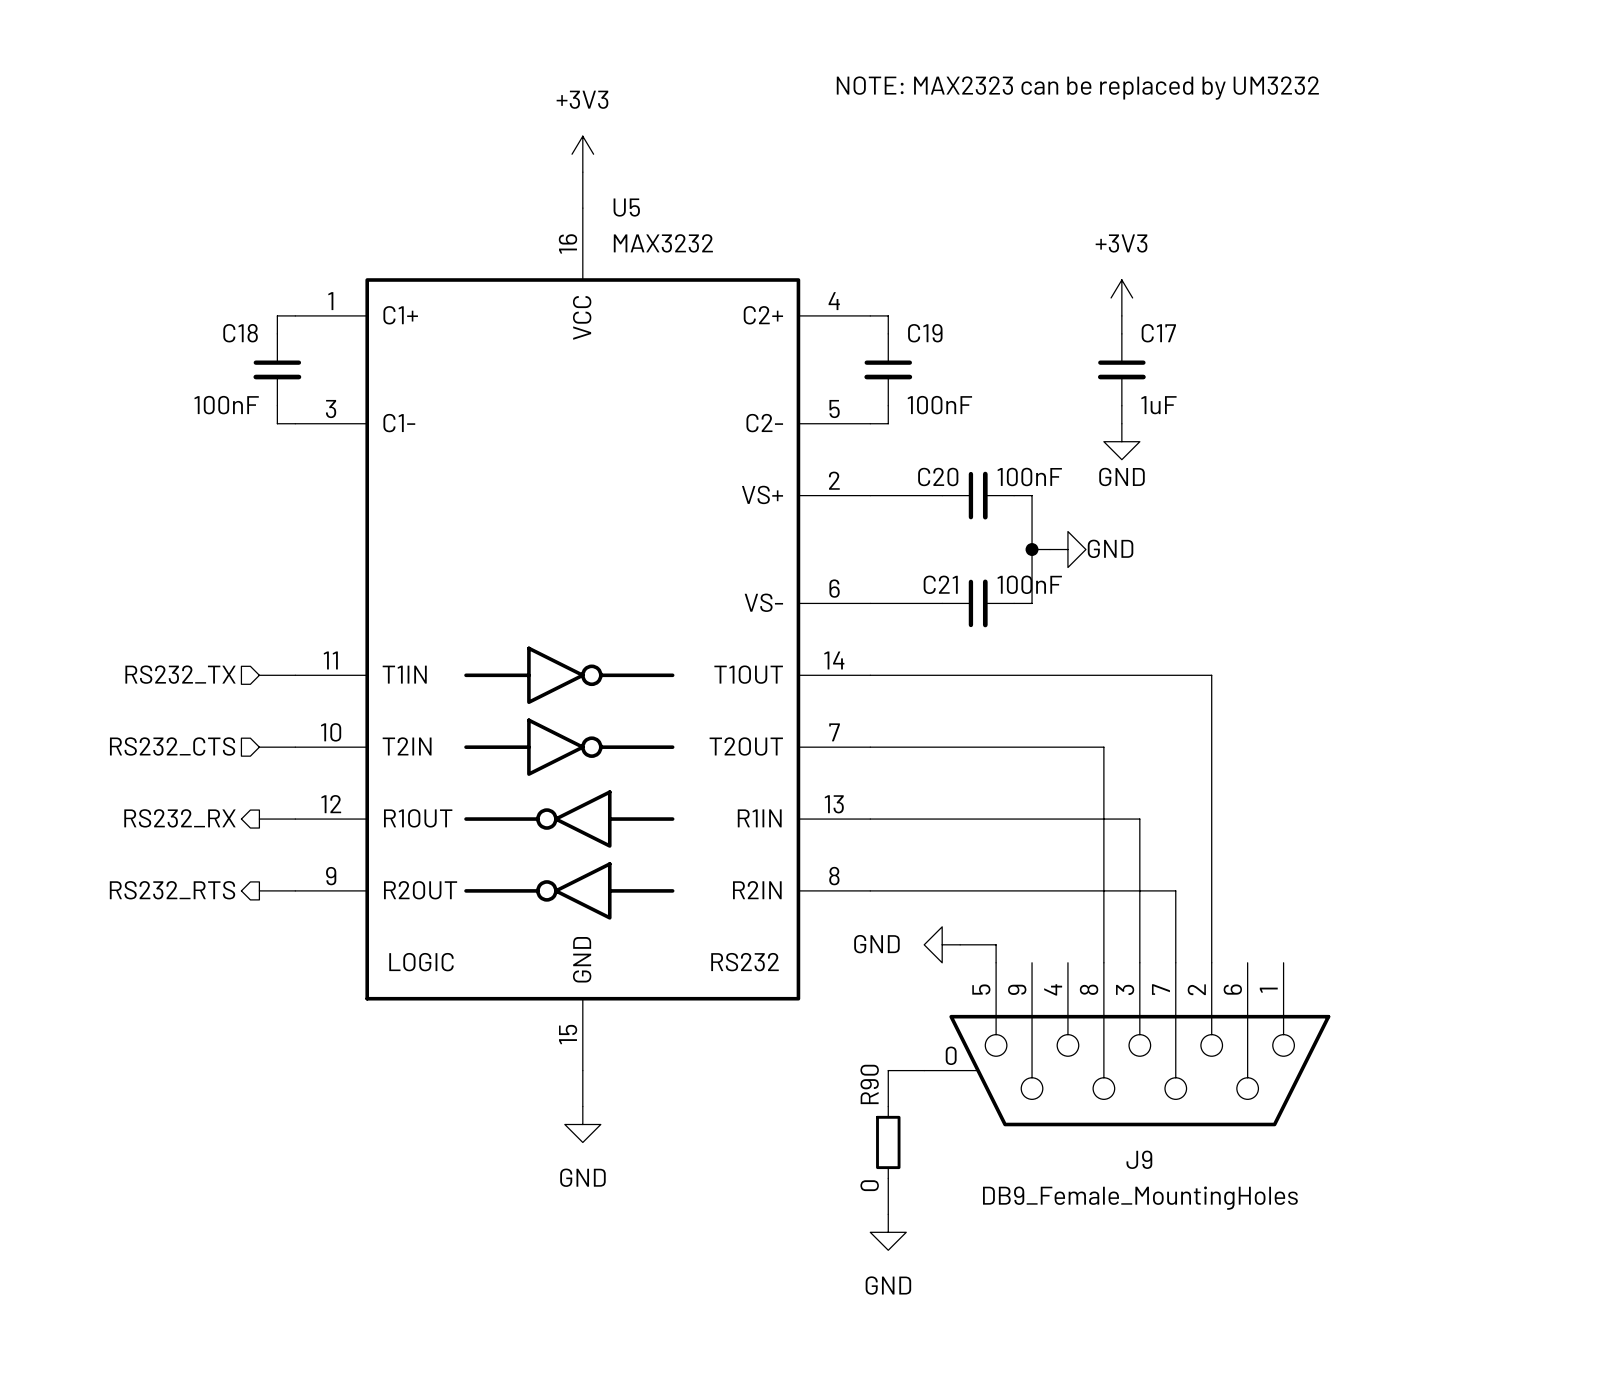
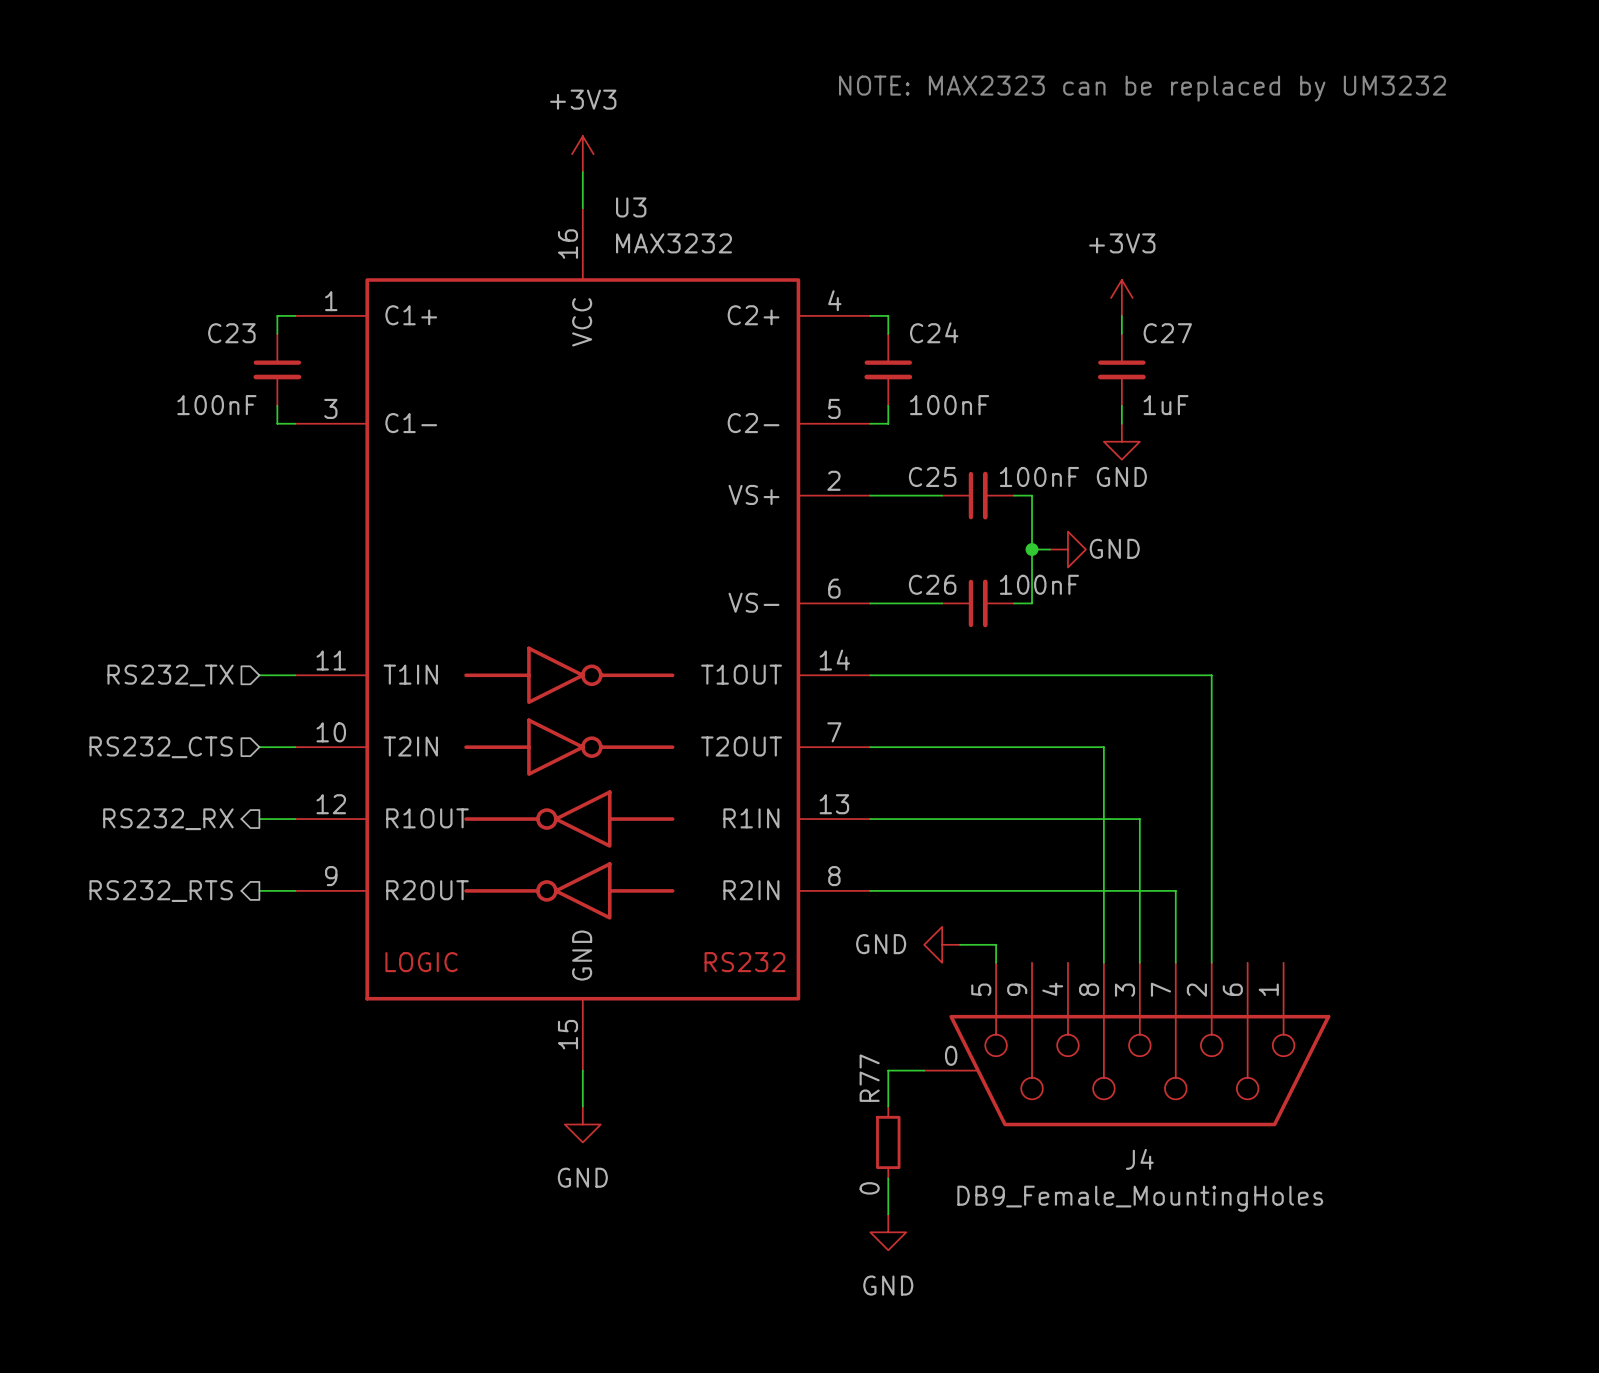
U5 name: U5 (626, 207) -> U3 (631, 207)
C18 name: C18 (240, 333) -> C23 (231, 333)
C19 name: C19 (925, 333) -> C24 (934, 332)
C17 name: C17 (1158, 333) -> C27 (1167, 333)
C20 name: C20 (938, 476) -> C25 (932, 476)
C21 name: C21 (940, 584) -> C26 (932, 584)
R90 name: R90 (869, 1084) -> R77 (869, 1078)
J9 name: J9 (1139, 1159) -> J4 (1139, 1159)

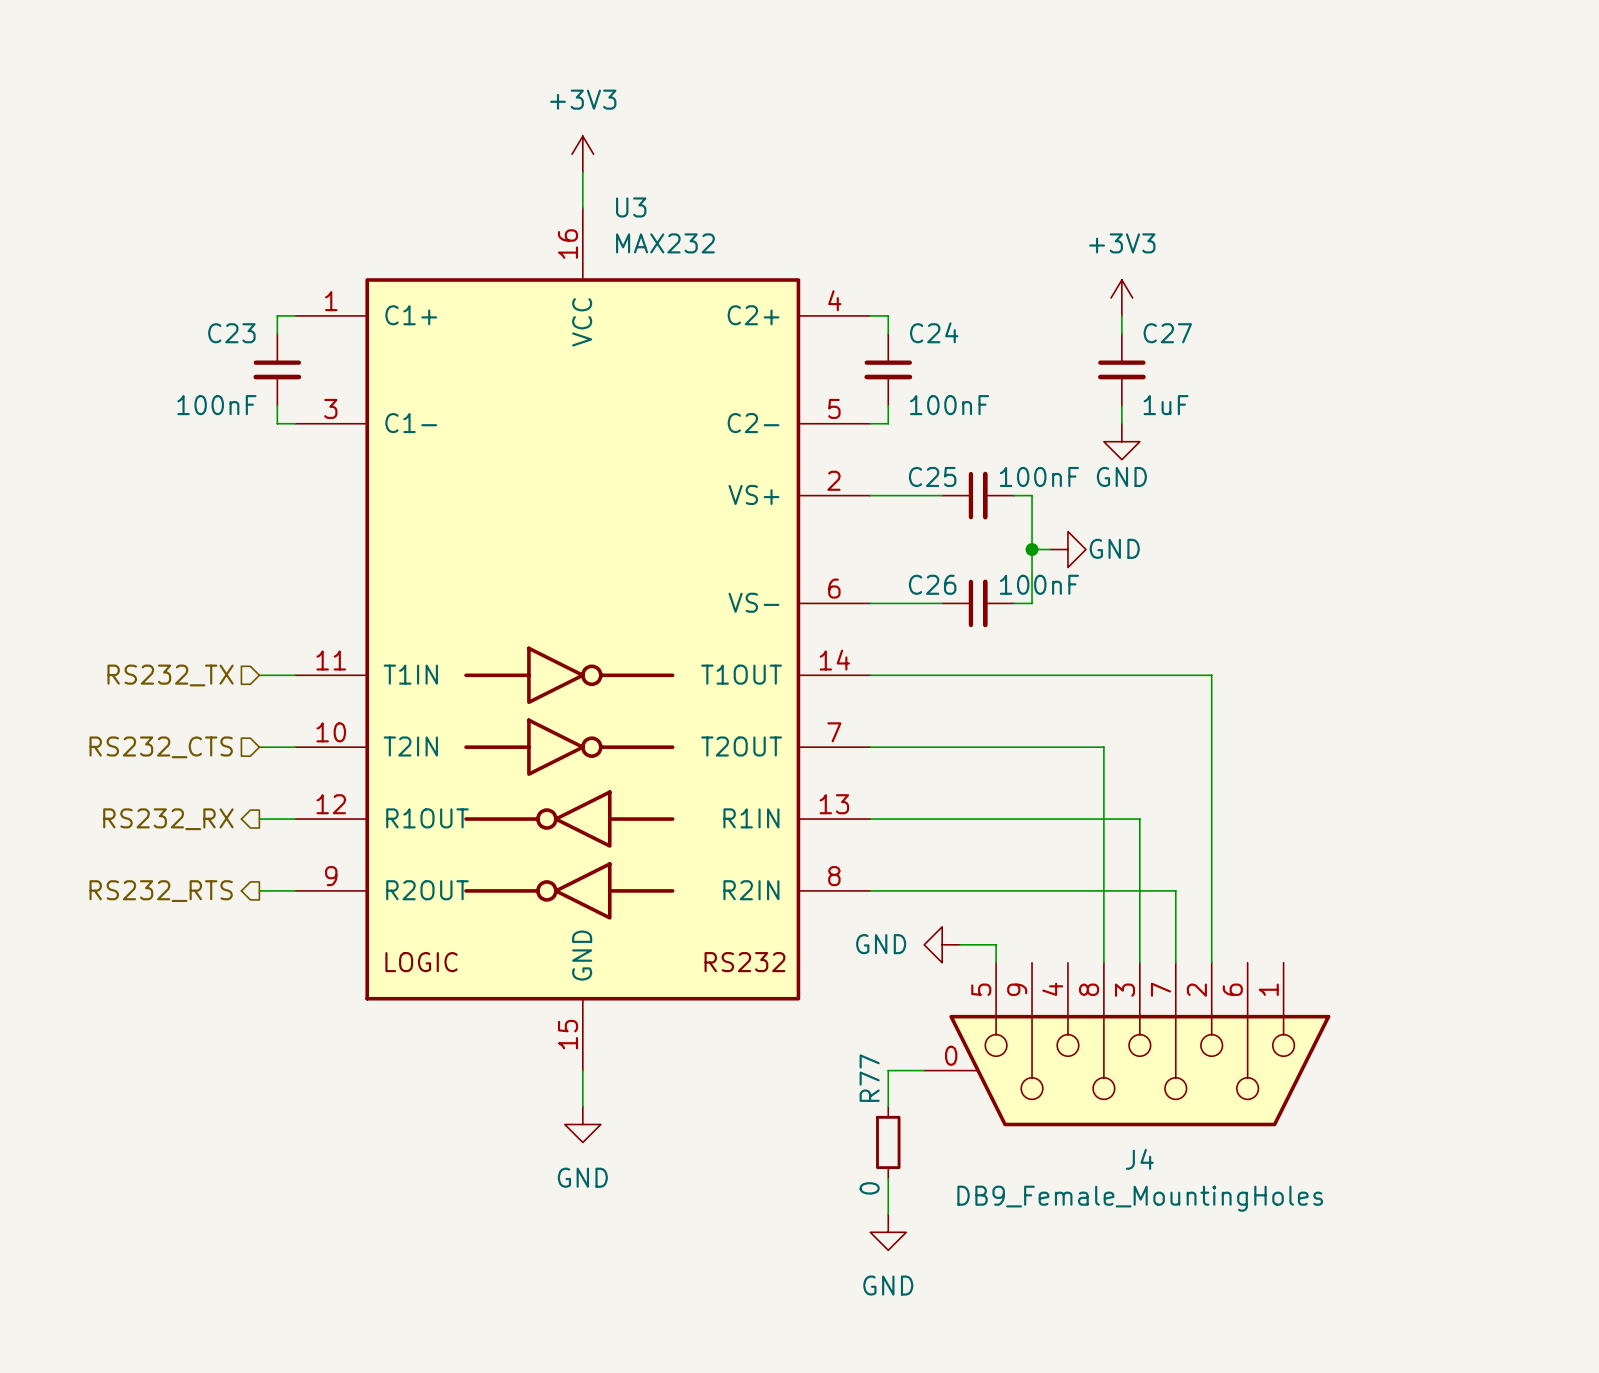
text: NOTE: MAX2323 can be replaced by UM3232 (1142, 88) -> none
U3 value: MAX3232 (673, 243) -> MAX232 (665, 243)

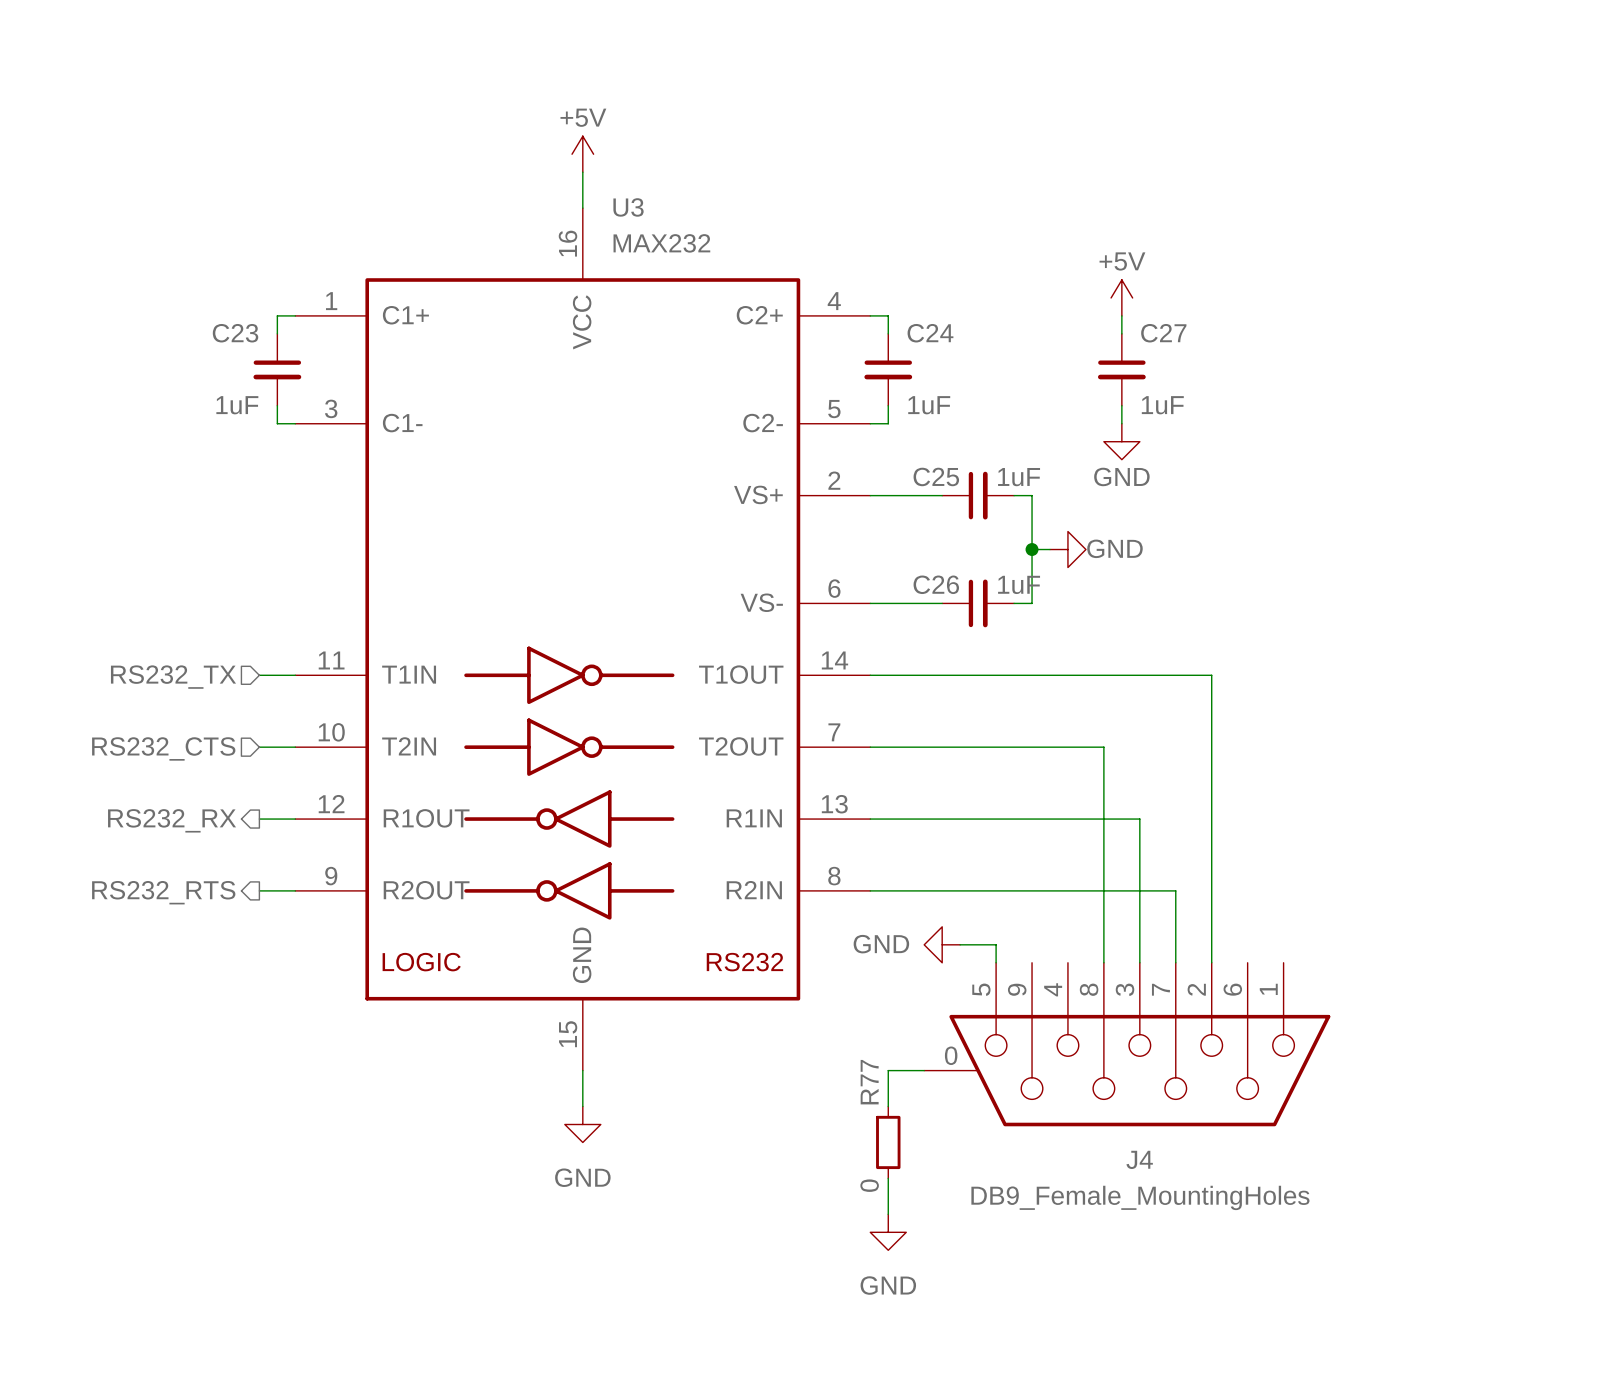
power symbol: +3V3 (582, 154) -> +5V (582, 154)
power symbol: +3V3 (1121, 297) -> +5V (1121, 297)
C23 value: 100nF (216, 405) -> 1uF (237, 405)
C24 value: 100nF (949, 405) -> 1uF (929, 405)
C25 value: 100nF (1039, 476) -> 1uF (1019, 477)
C26 value: 100nF (1039, 584) -> 1uF (1019, 584)

